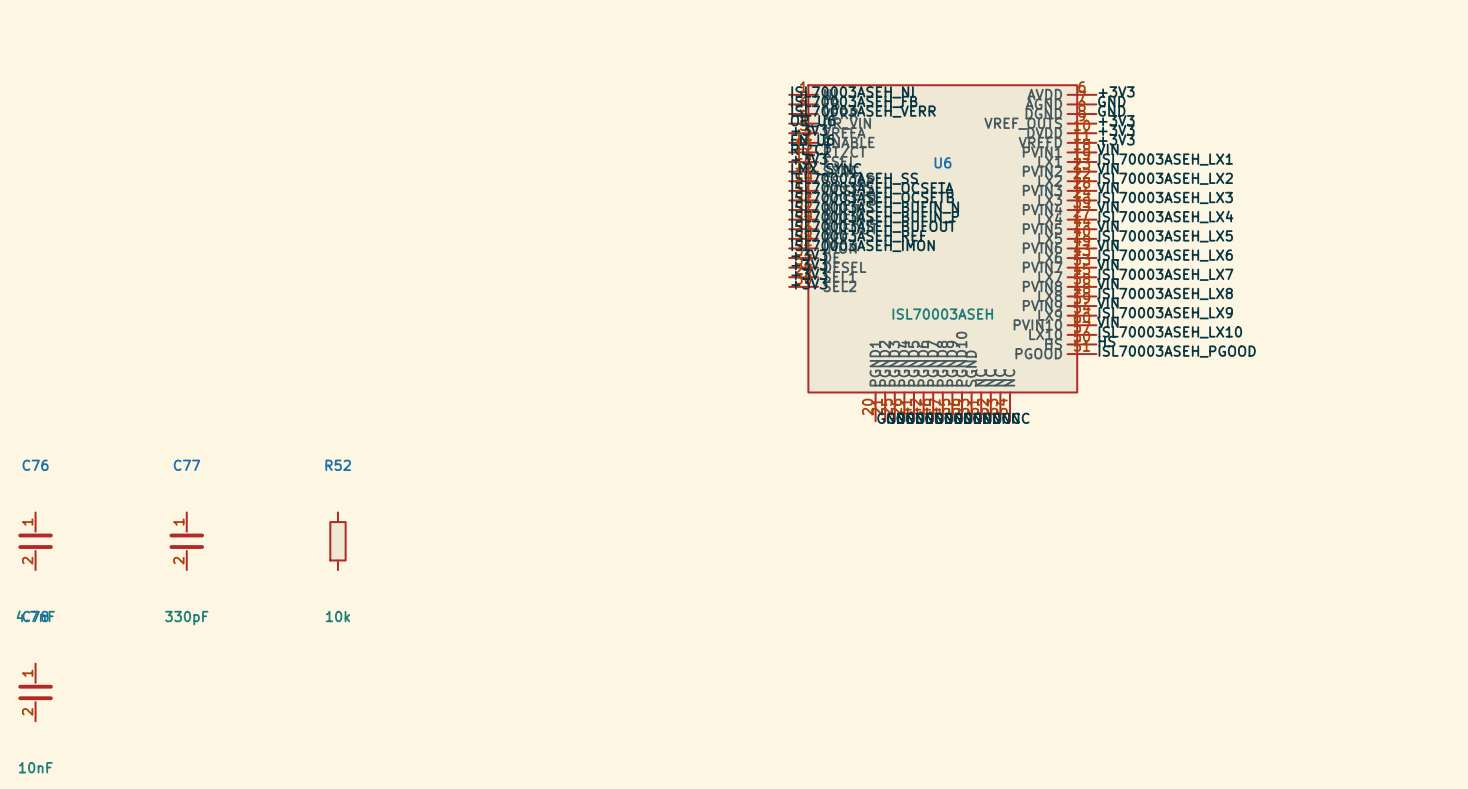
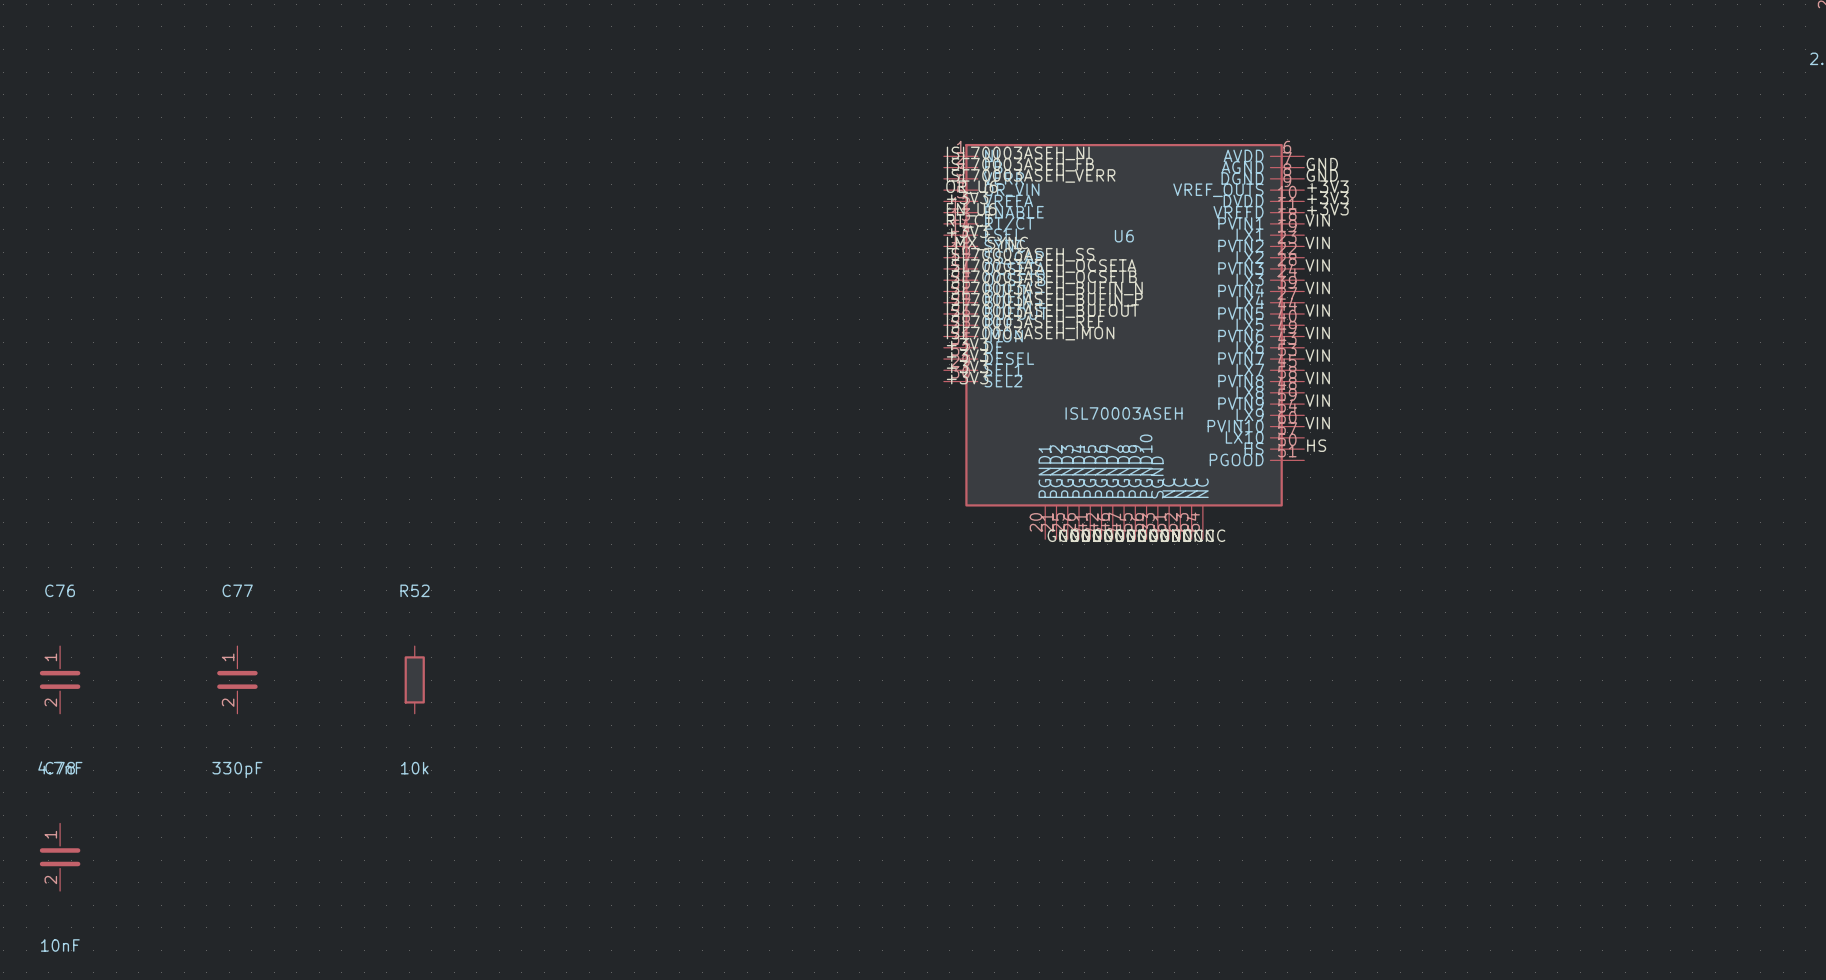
label: +3V3 (1116, 91) -> none
label: ISL70003ASEH_LX1 (1165, 159) -> none
label: ISL70003ASEH_LX2 (1165, 178) -> none
label: ISL70003ASEH_LX3 (1165, 197) -> none
label: ISL70003ASEH_LX4 (1165, 216) -> none
label: ISL70003ASEH_LX5 (1165, 236) -> none
label: ISL70003ASEH_LX6 (1165, 255) -> none
label: ISL70003ASEH_LX7 (1165, 274) -> none
label: ISL70003ASEH_LX8 (1165, 293) -> none
label: ISL70003ASEH_LX9 (1165, 313) -> none
label: ISL70003ASEH_LX10 (1170, 332) -> none
label: ISL70003ASEH_PGOOD (1177, 351) -> none

